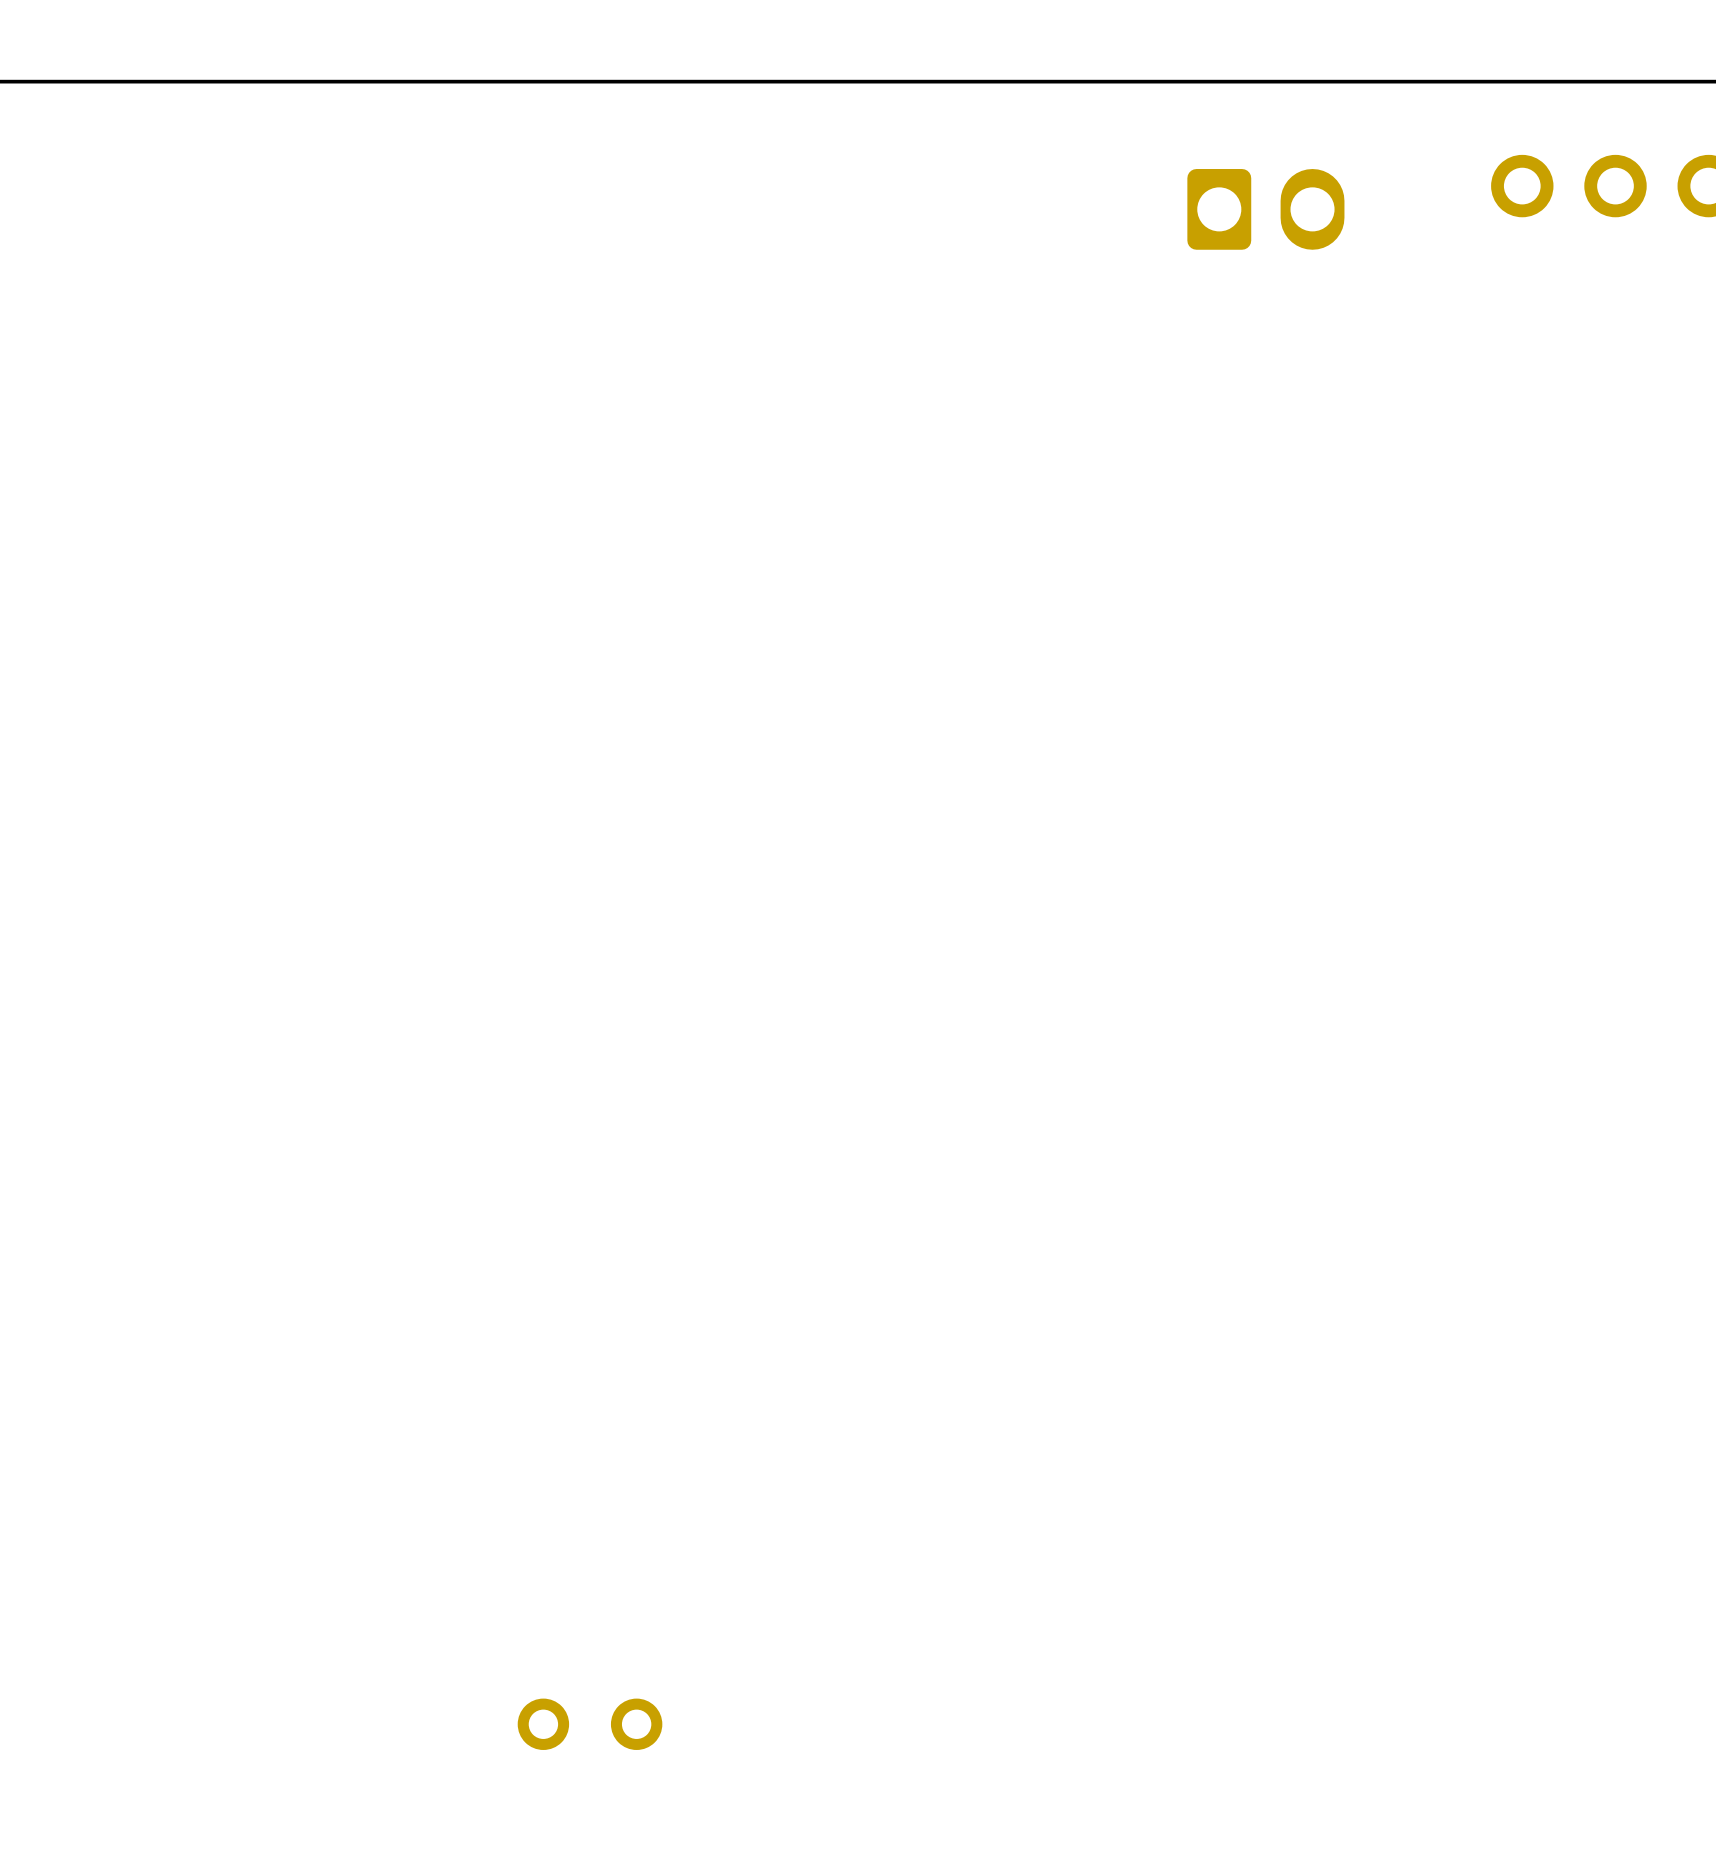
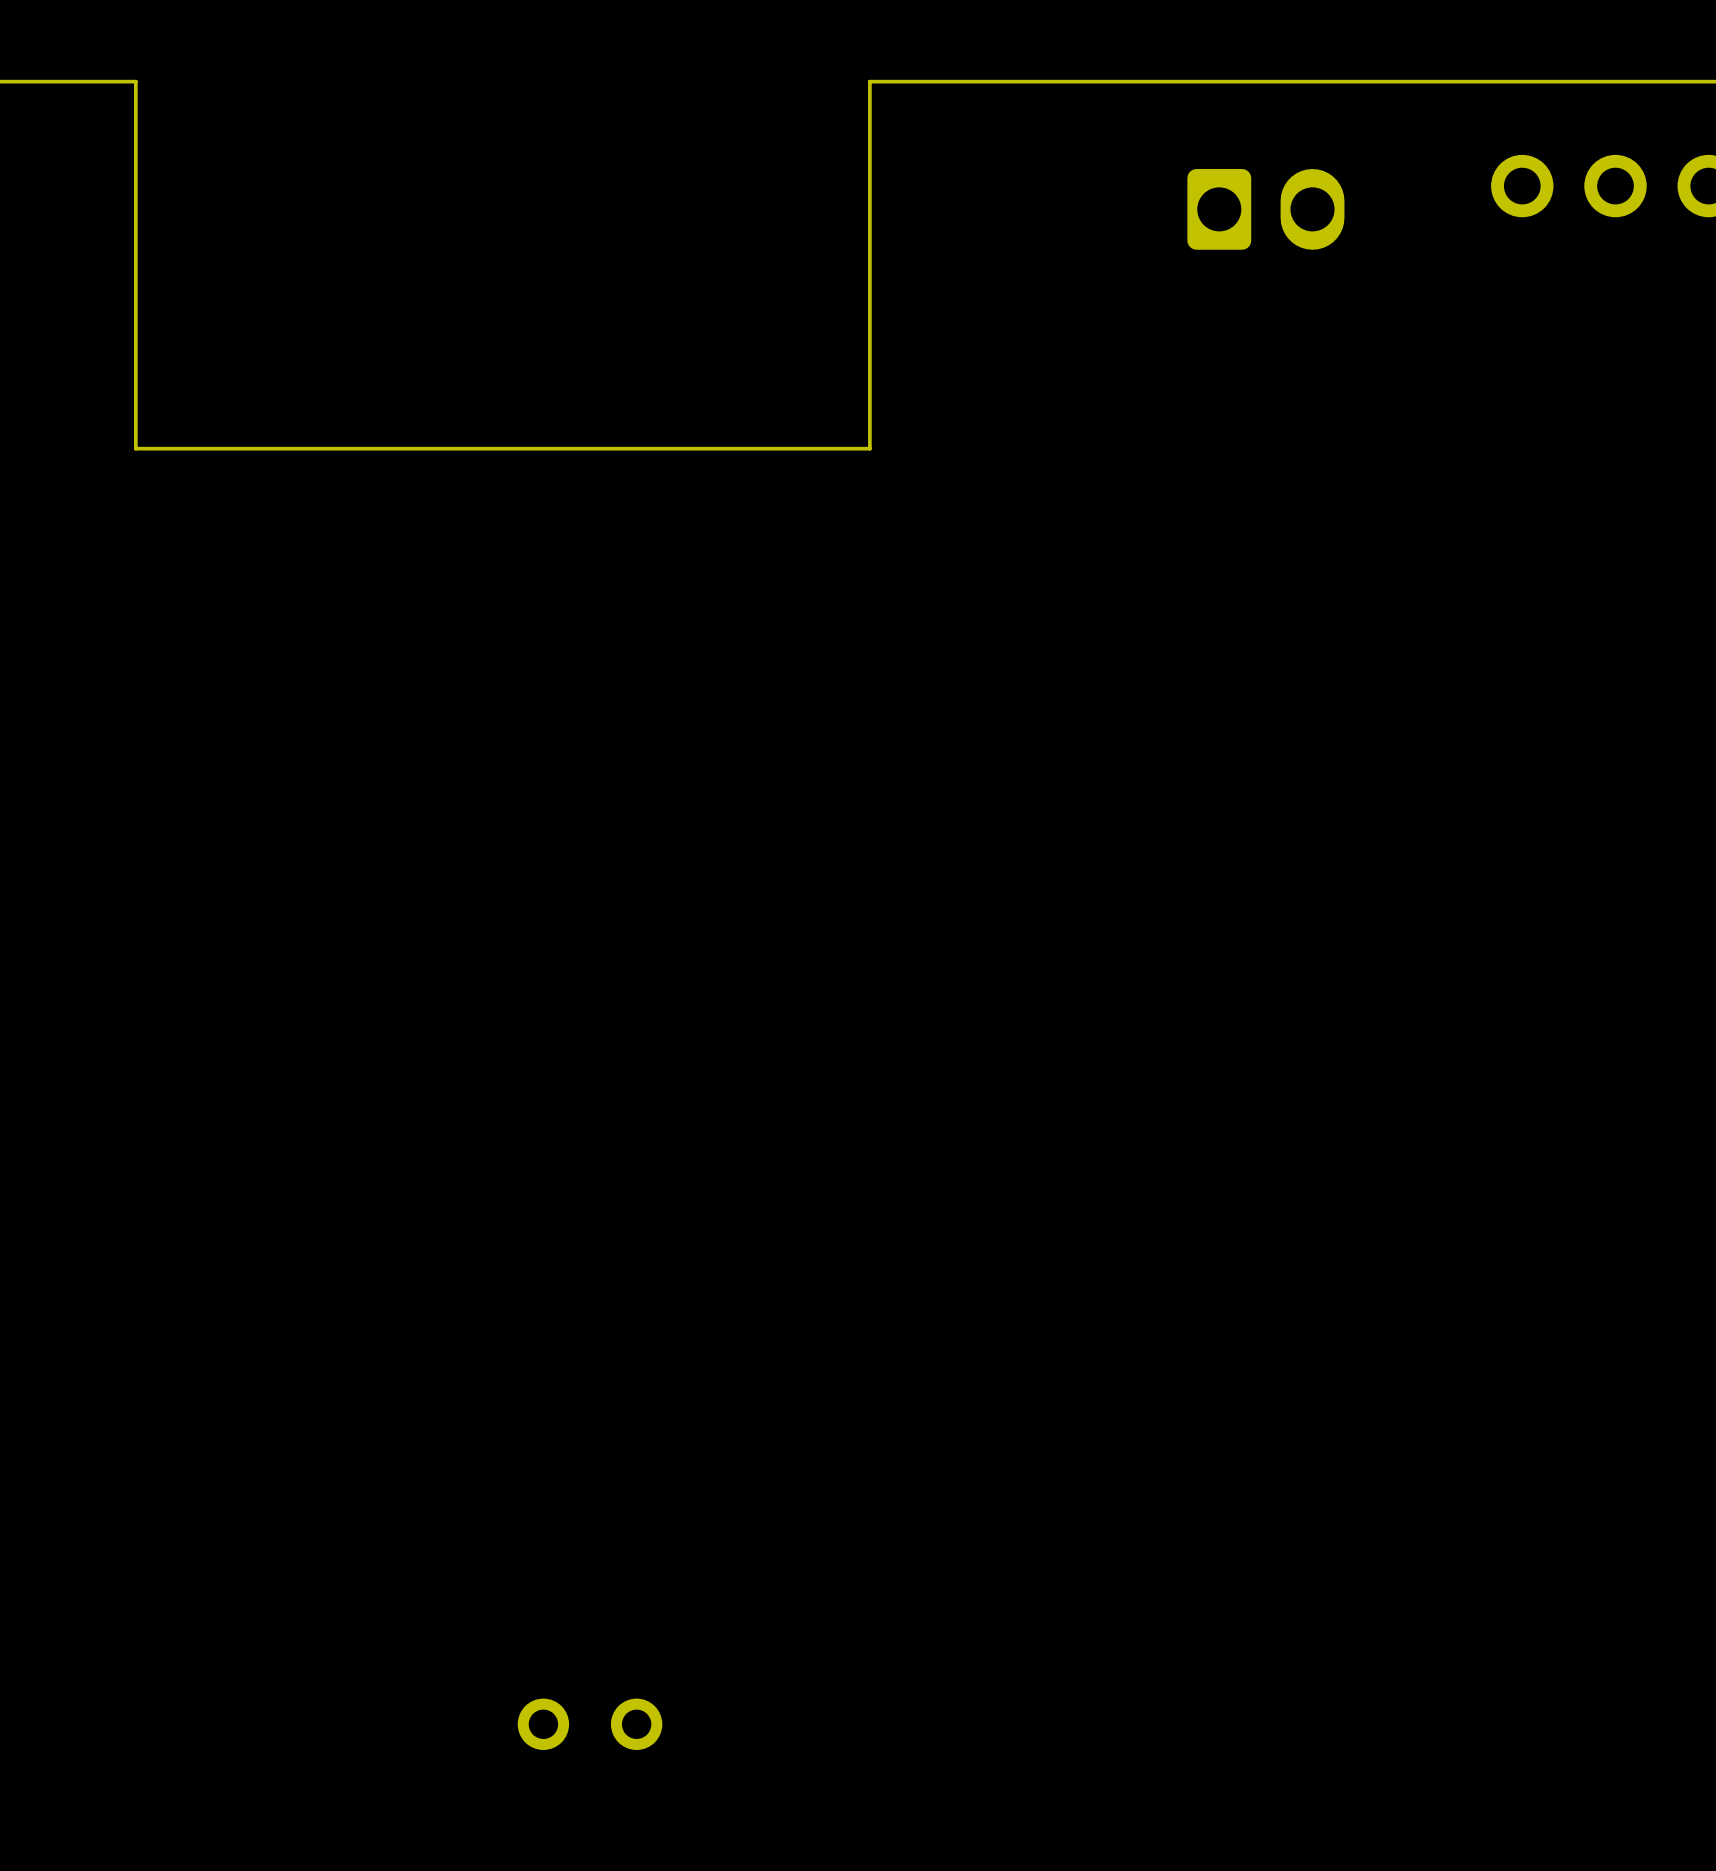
board edge: (869, 81) (135, 81) -> (869, 81) (869, 448) (135, 448) (135, 81)

